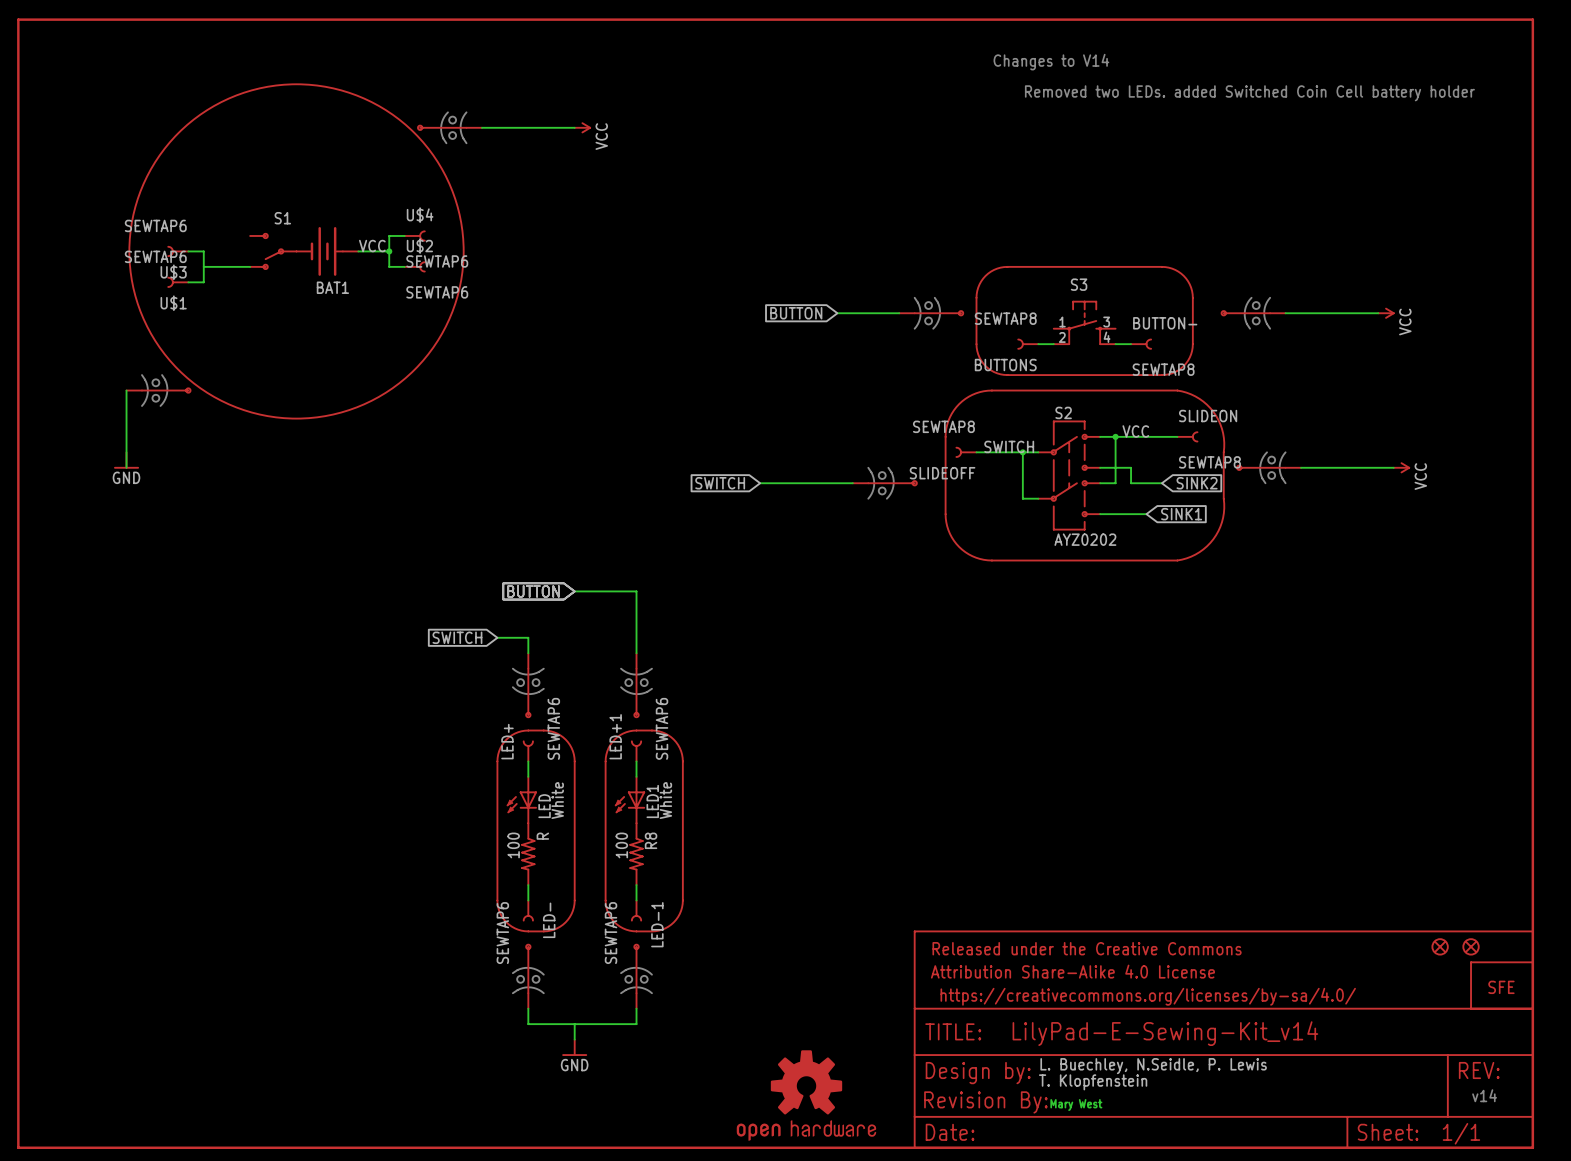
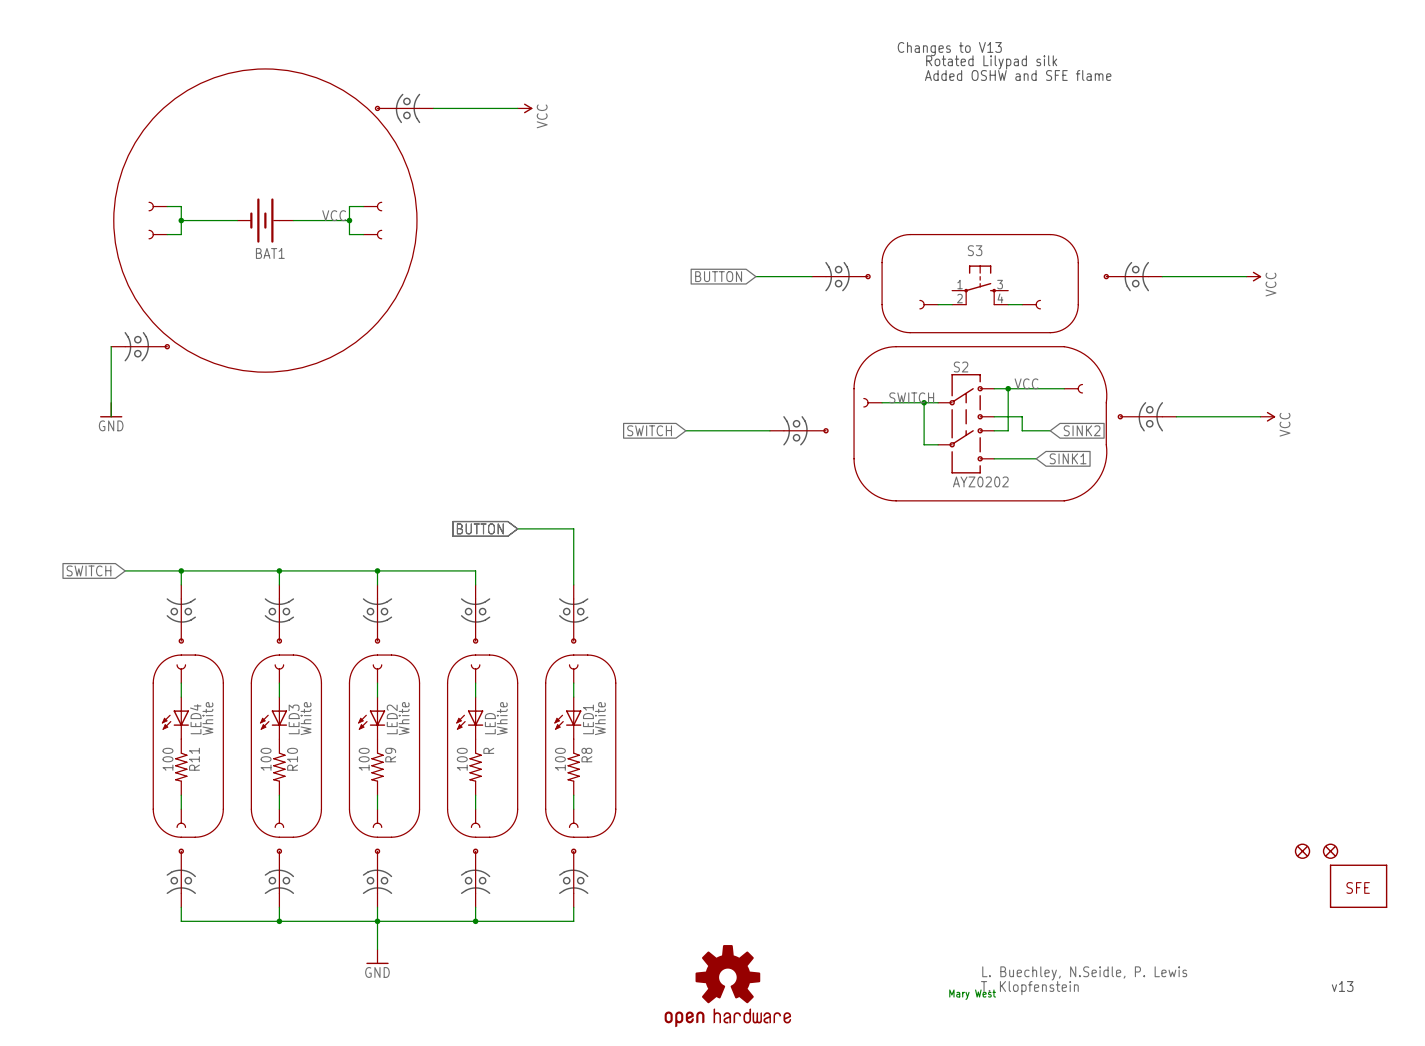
text: Changes to V14 (1051, 62) -> Changes to V13 (949, 49)
text: none -> Rotated Lilypad silk (991, 62)
text: Removed two LEDs. added Switched Coin Cell battery holder (1249, 93) -> Added OSHW and SFE flame (1018, 75)
U$4 name: U$4 (420, 215) -> none
part: none -> (158, 206)
wire: none -> (167, 206) (181, 206) (181, 220) (237, 220)
U$2 name: U$2 (419, 246) -> none
U$3: SEWTAP6 (178, 251) -> none
wire: (188, 251) (203, 251) -> (167, 234) (181, 234)
junction: none -> (181, 220)
S1: (273, 251) -> none
BAT1 position: (327, 251) -> (265, 220)
U$4 value: SEWTAP6 (437, 261) -> none
part: none -> (158, 234)
wire: (250, 266) (203, 266) (203, 282) (188, 282) -> none
U$1: SEWTAP6 (178, 282) -> none
U$2 value: SEWTAP6 (437, 292) -> none
BUTTONS value: SEWTAP8 (1005, 318) -> none
BUTTON- name: BUTTON- (1165, 323) -> none
BUTTONS name: BUTTONS (1005, 365) -> none
BUTTON- value: SEWTAP8 (1163, 369) -> none
SLIDEON name: SLIDEON (1208, 416) -> none
SLIDEOFF value: SEWTAP8 (943, 426) -> none
SLIDEON value: SEWTAP8 (1209, 462) -> none
SLIDEOFF name: SLIDEOFF (942, 473) -> none
part: (775, 583) -> none
global label: none -> SWITCH (88, 570)
wire: none -> (125, 570) (447, 570)
wire: none -> (181, 570) (181, 584)
junction: none -> (181, 570)
wire: none -> (279, 570) (279, 584)
junction: none -> (279, 570)
wire: none -> (377, 570) (377, 584)
junction: none -> (377, 570)
global label: SWITCH (457, 637) -> none
part: none -> (181, 614)
part: none -> (279, 614)
part: none -> (377, 614)
LED+ value: SEWTAP6 (553, 728) -> none
LED+1 value: SEWTAP6 (662, 728) -> none
line: none -> (181, 655) (198, 655) (210, 659) (219, 668) (223, 679) (223, 812) (220, 821) (215, 829) (207, 834) (198, 837) (178, 837) (169, 834) (157, 824) (153, 812) (153, 676) (157, 668) (163, 661) (172, 656) (181, 655)
line: none -> (279, 655) (296, 655) (308, 659) (317, 668) (321, 679) (321, 812) (318, 821) (313, 829) (305, 834) (296, 837) (276, 837) (267, 834) (255, 824) (251, 812) (252, 676) (255, 668) (261, 661) (270, 656) (279, 655)
line: none -> (377, 655) (394, 655) (406, 659) (415, 668) (419, 679) (419, 812) (416, 821) (411, 829) (403, 834) (394, 837) (374, 837) (365, 834) (353, 824) (349, 812) (350, 676) (353, 668) (360, 661) (368, 656) (377, 655)
LED+1 name: LED+1 (615, 736) -> none
LED+ name: LED+ (507, 741) -> none
part: none -> (181, 673)
part: none -> (279, 673)
part: none -> (377, 673)
wire: none -> (181, 683) (181, 697)
wire: none -> (279, 683) (279, 697)
wire: none -> (377, 683) (377, 697)
LED4: none -> White (175, 718)
LED3: none -> White (273, 718)
LED2: none -> White (371, 718)
R11: none -> 100 (181, 767)
R10: none -> 100 (279, 767)
R9: none -> 100 (377, 767)
wire: none -> (181, 795) (181, 809)
wire: none -> (279, 795) (279, 809)
wire: none -> (377, 795) (377, 809)
part: none -> (181, 818)
part: none -> (279, 818)
part: none -> (377, 818)
LED- name: LED- (549, 920) -> none
LED-1 name: LED-1 (657, 924) -> none
LED- value: SEWTAP6 (502, 933) -> none
LED-1 value: SEWTAP6 (611, 933) -> none
part: none -> (181, 877)
part: none -> (279, 877)
part: none -> (377, 877)
wire: none -> (181, 907) (181, 921) (475, 921)
wire: none -> (279, 907) (279, 921)
wire: none -> (377, 907) (377, 949)
junction: none -> (279, 921)
junction: none -> (377, 921)
junction: none -> (475, 921)
wire: (574, 1024) (574, 1039) -> none
part: (1223, 1039) -> none
power symbol: GND (574, 1047) -> none
power symbol: none -> GND (377, 956)
text position: L. Buechley, N.Seidle, P. Lewis (1153, 1066) -> L. Buechley, N.Seidle, P. Lewis (1084, 973)
text position: T. Klopfenstein (1093, 1082) -> T. Klopfenstein (1029, 988)
text: v14 (1484, 1095) -> v13 (1342, 986)
part: (985, 1102) -> none

